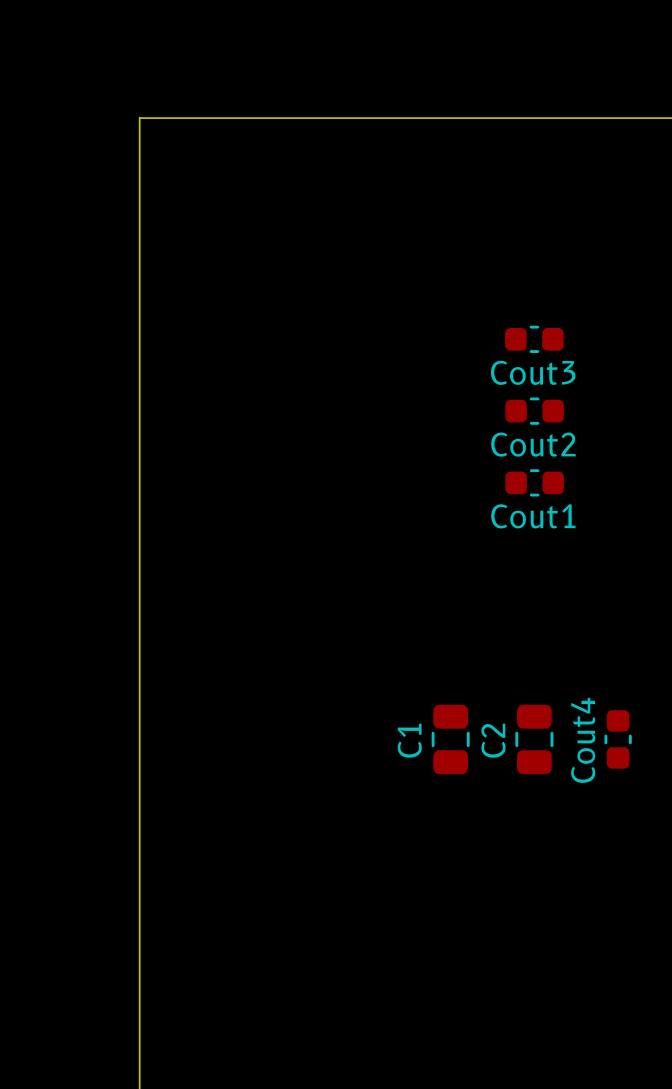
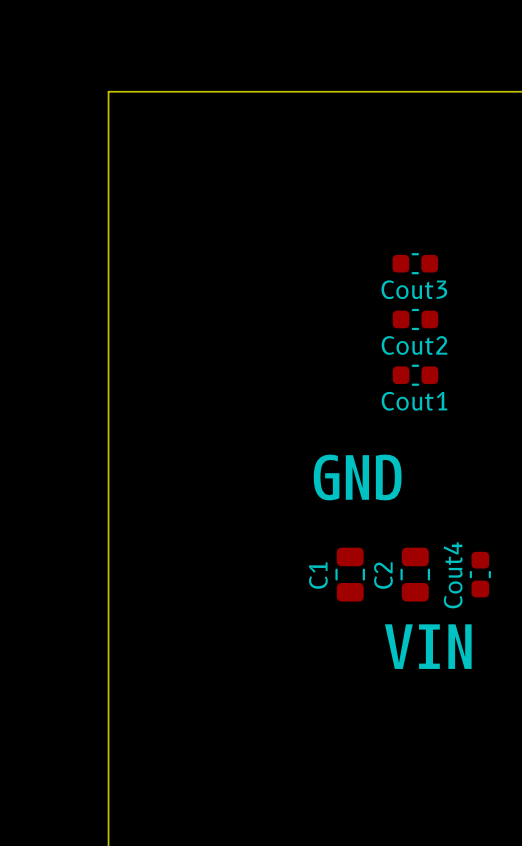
drawing: none -> [313, 454, 402, 501]
drawing: none -> [384, 624, 472, 669]

